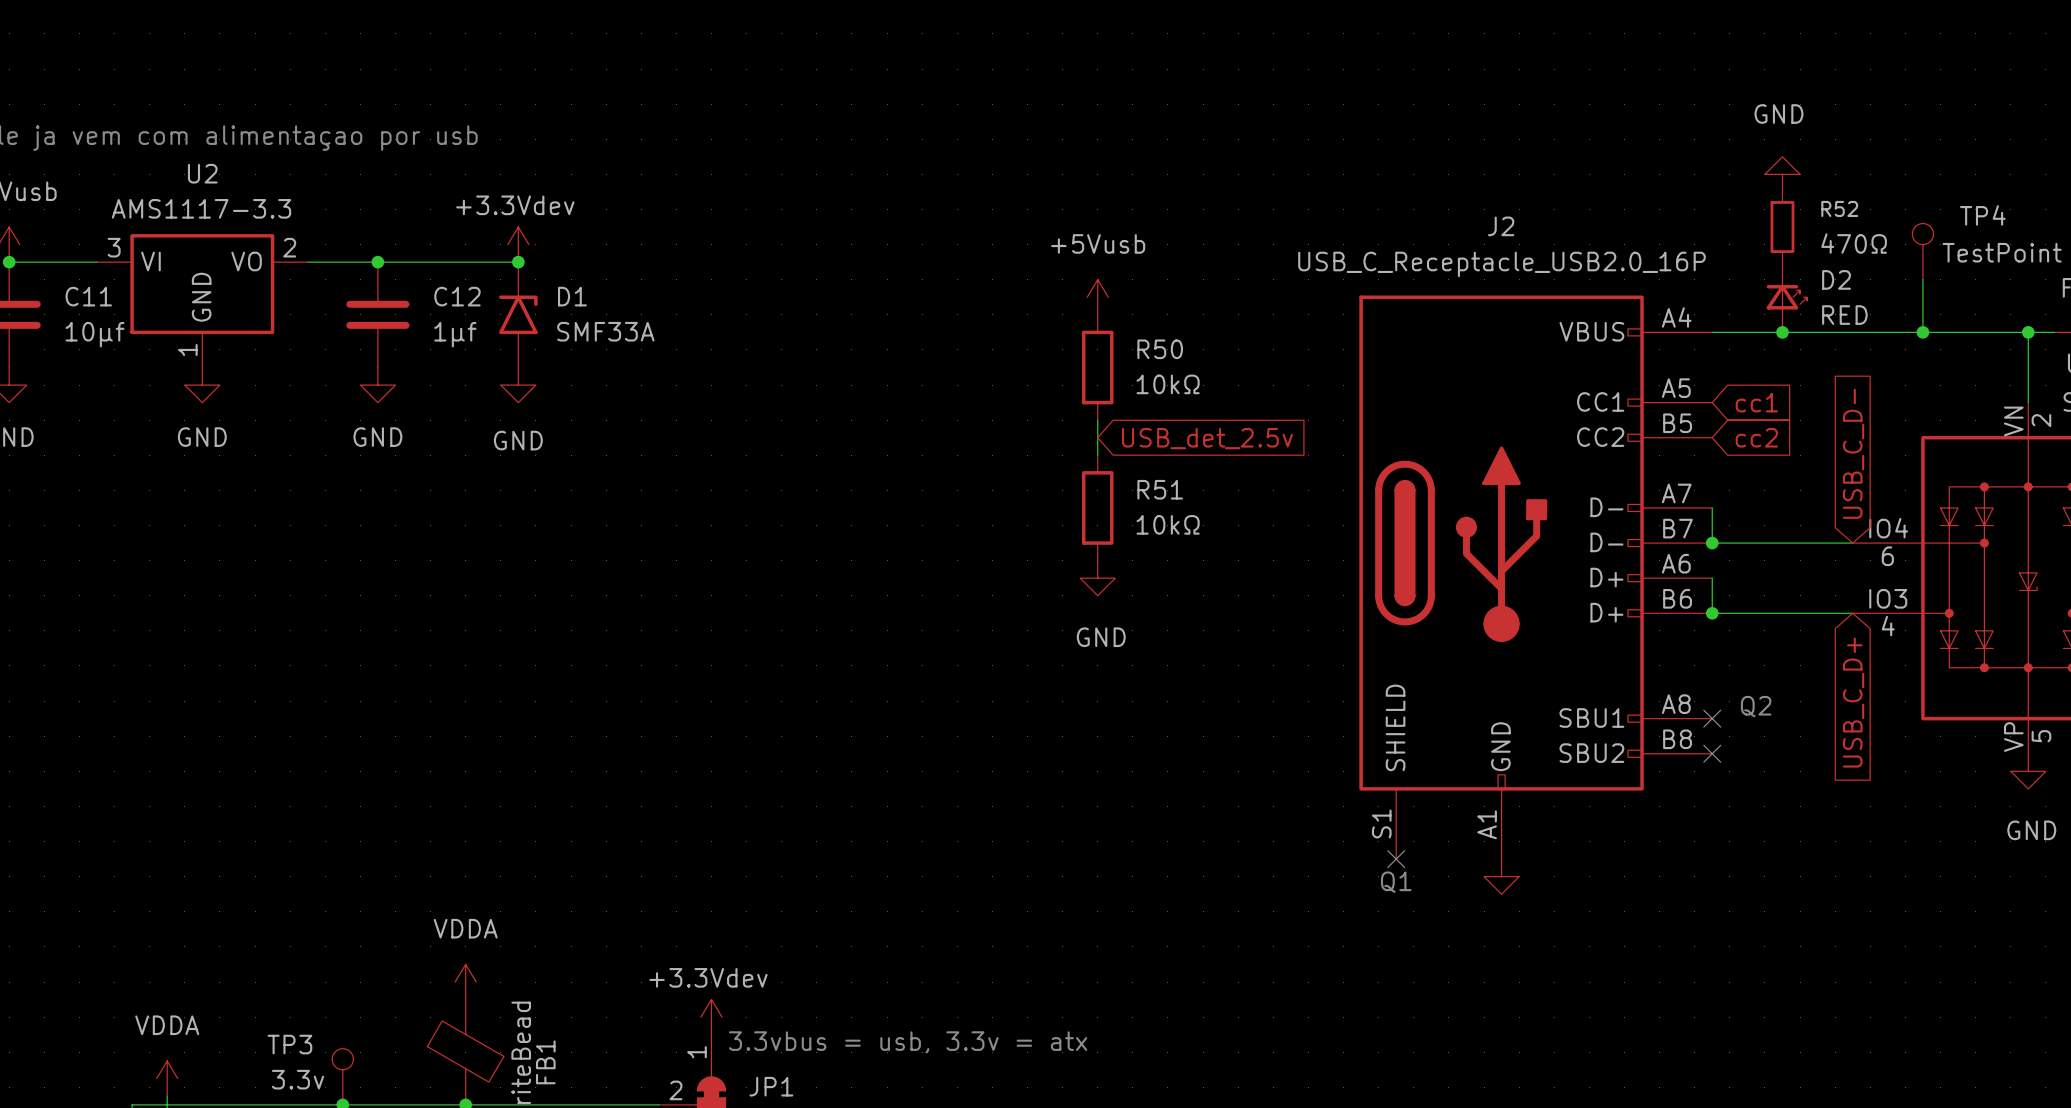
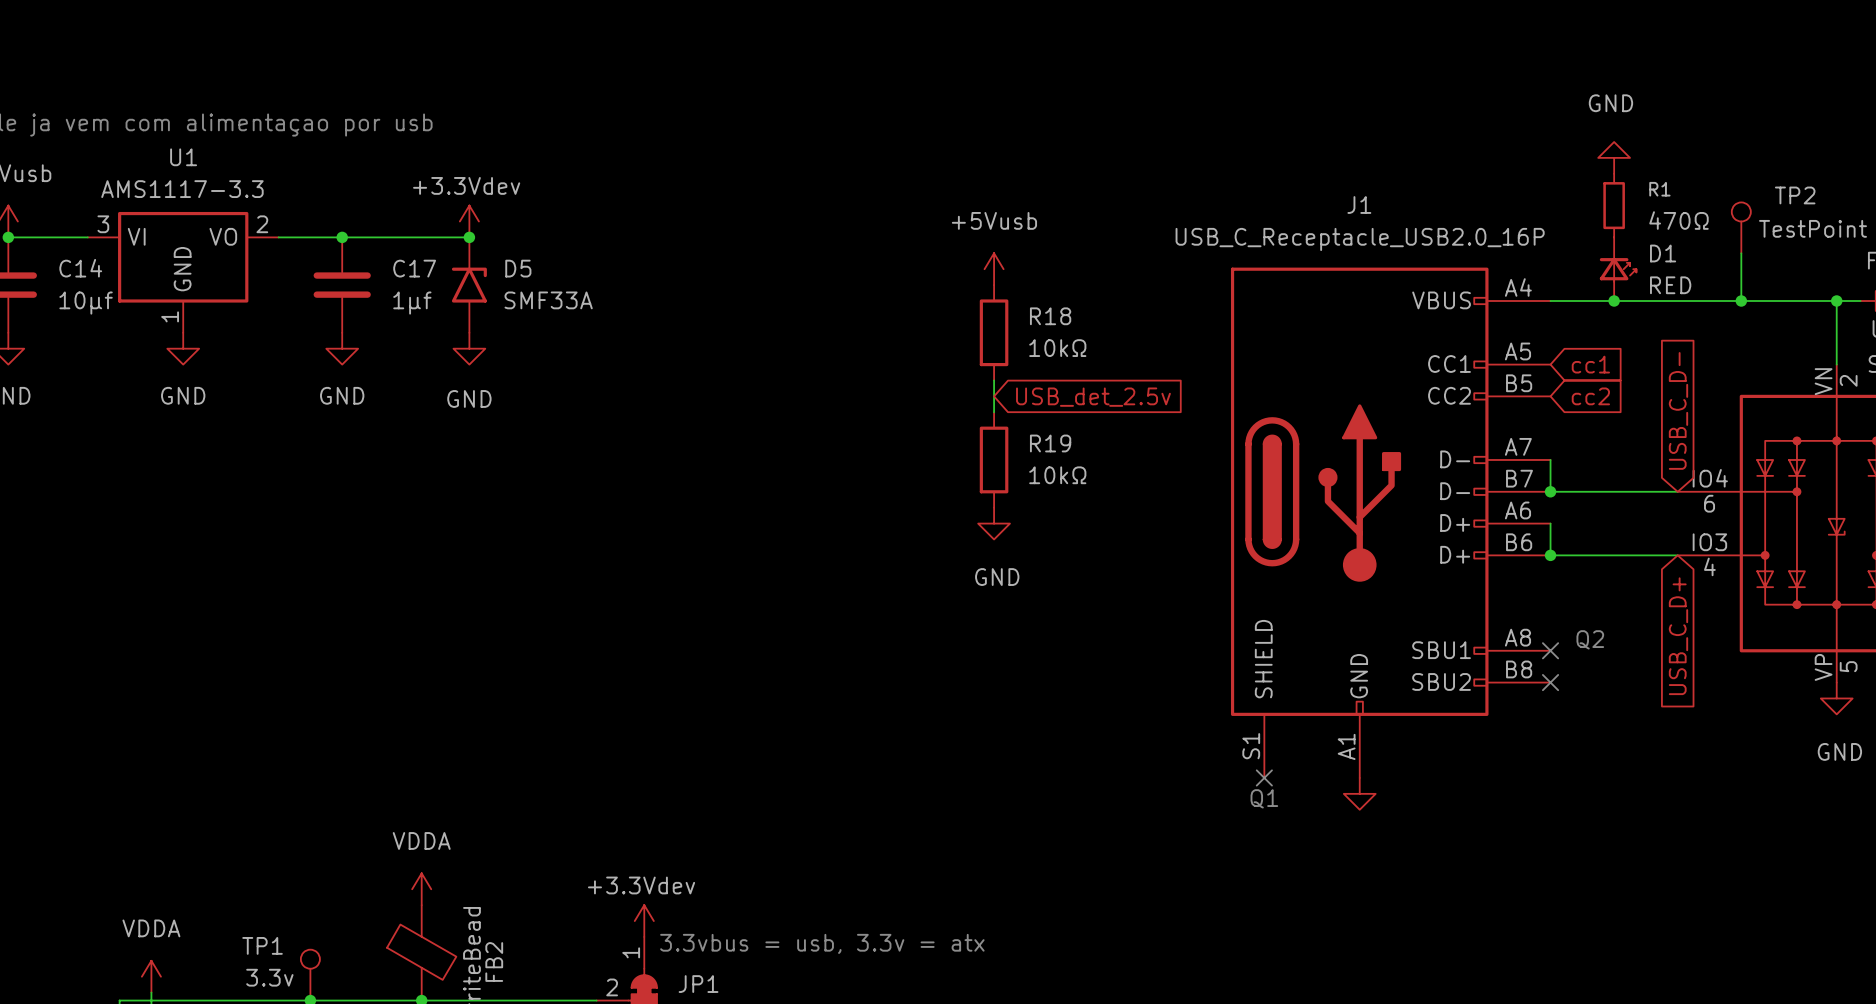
U2 name: U2 (202, 173) -> U1 (183, 157)
R52 name: R52 (1839, 208) -> R1 (1659, 189)
TP4 name: TP4 (1982, 215) -> TP2 (1795, 195)
J2 name: J2 (1501, 226) -> J1 (1359, 205)
D2 name: D2 (1836, 279) -> D1 (1663, 253)
C11 name: C11 (88, 296) -> C14 (80, 268)
C12 name: C12 (457, 296) -> C17 (414, 268)
D1 name: D1 (572, 296) -> D5 (518, 268)
R50 name: R50 (1160, 349) -> R18 (1050, 316)
R51 name: R51 (1160, 489) -> R19 (1050, 443)
TP3 name: TP3 (289, 1044) -> TP1 (262, 945)
FB1 name: FB1 (545, 1062) -> FB2 (494, 962)

